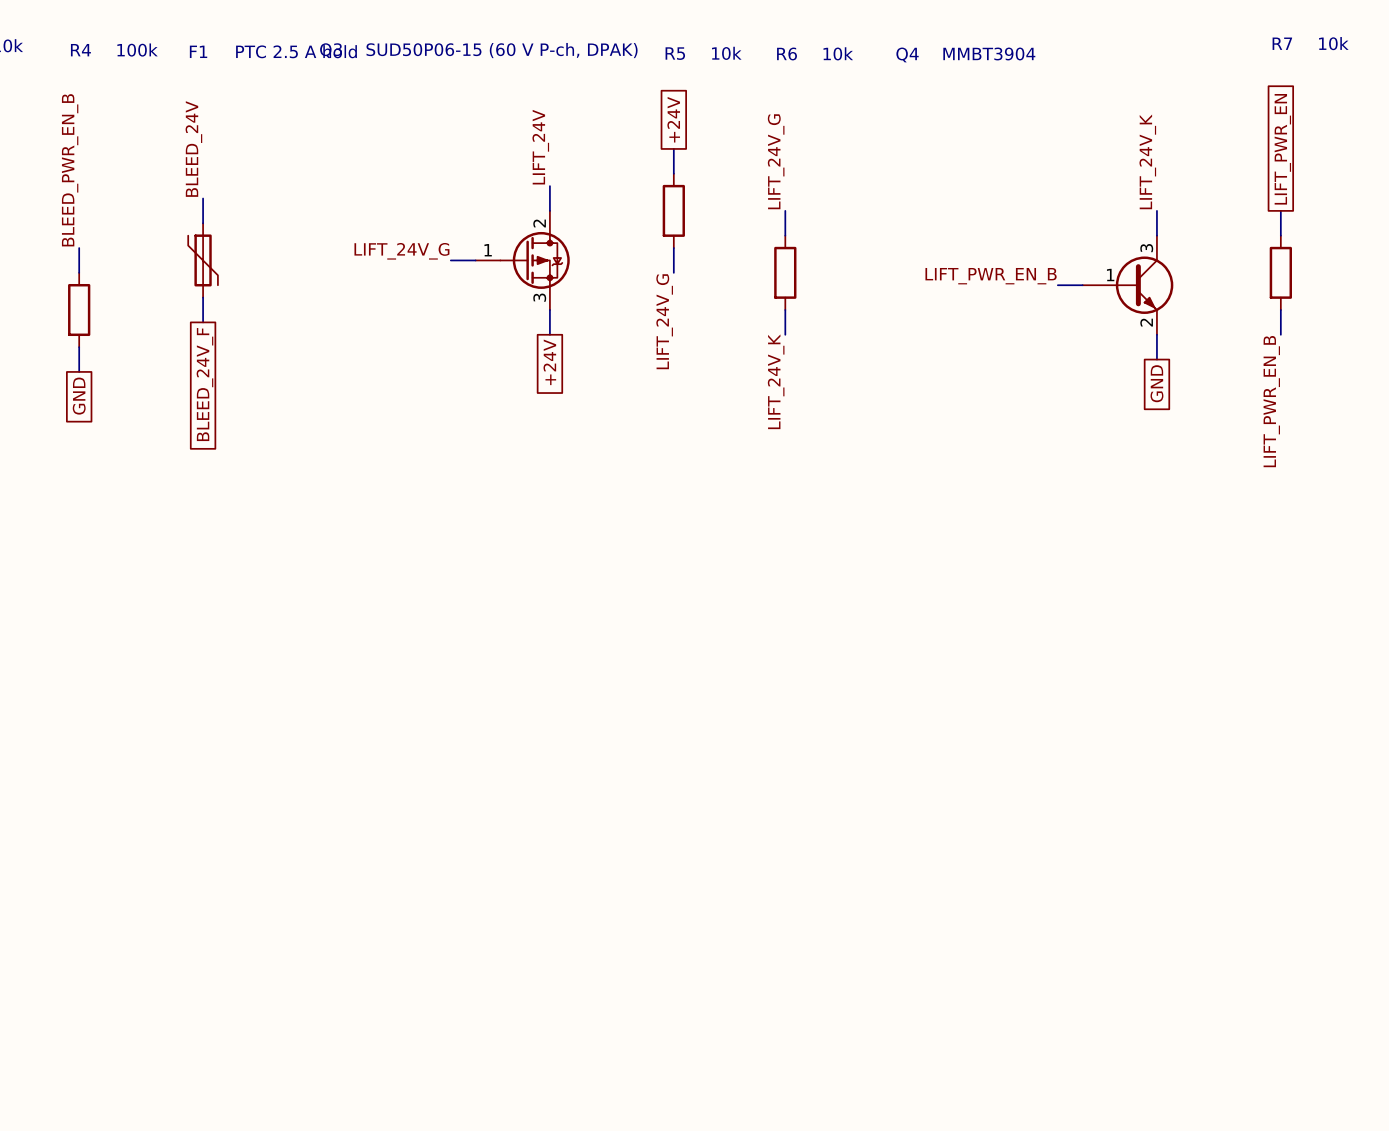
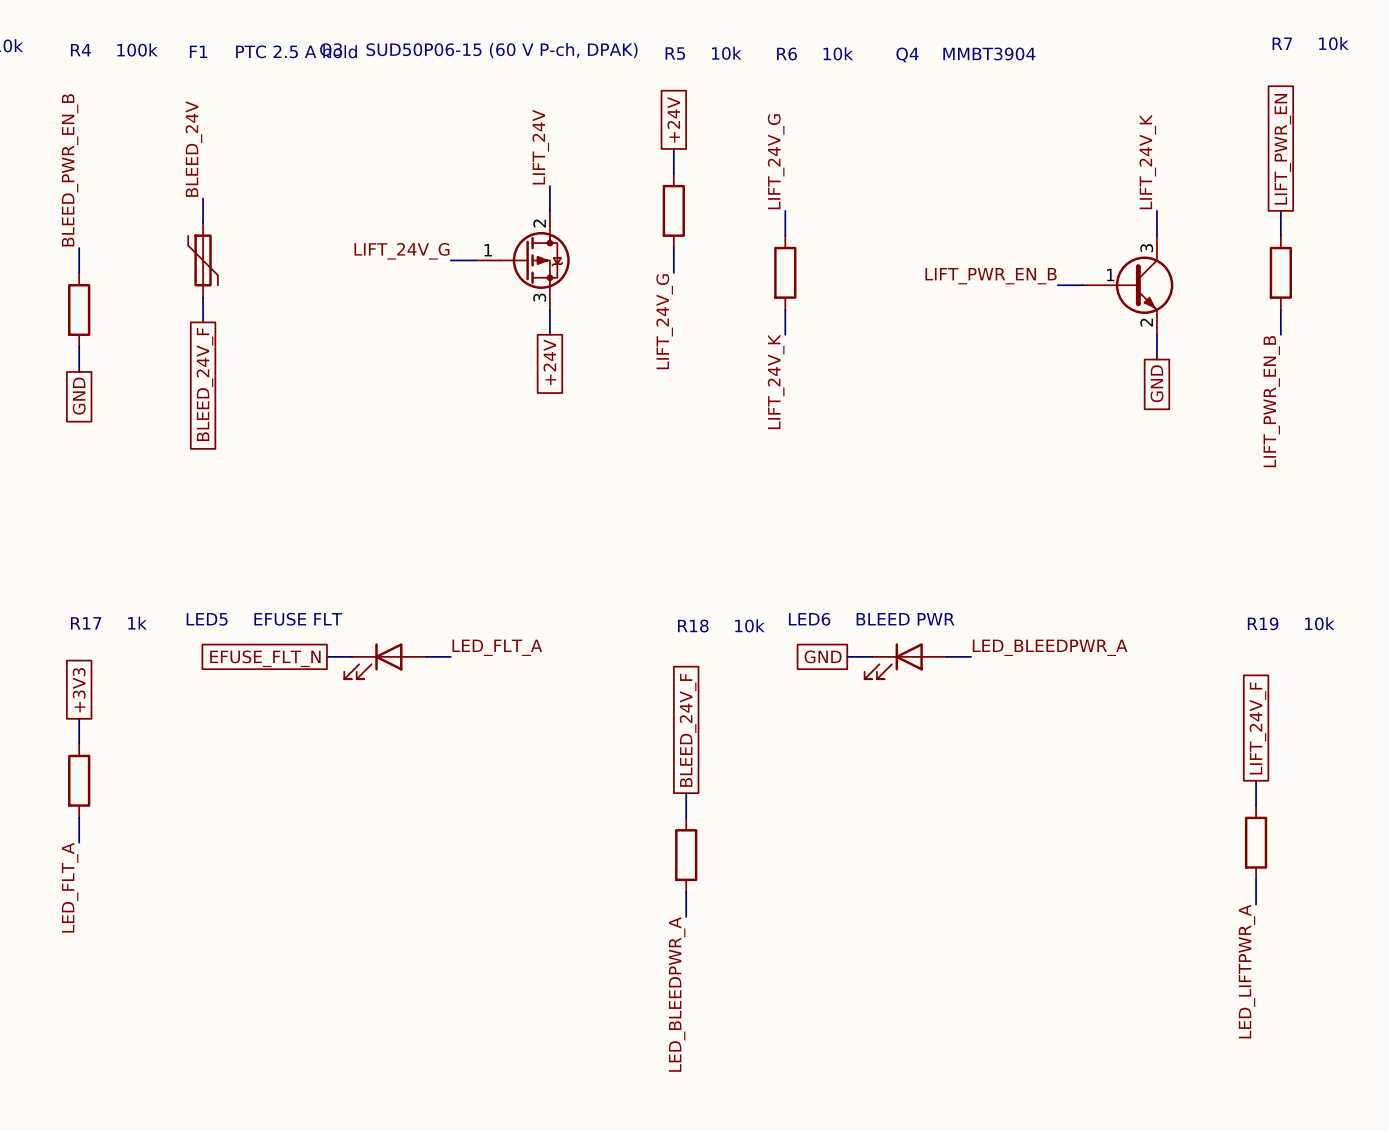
label: none -> LED_FLT_A (497, 647)
label: none -> LED_BLEEDPWR_A (1050, 647)
wire: none -> (326, 656) (351, 656)
wire: none -> (426, 656) (450, 656)
global label: none -> GND (823, 656)
wire: none -> (847, 656) (872, 656)
wire: none -> (946, 656) (971, 656)
global label: none -> EFUSE_FLT_N (265, 658)
LED5: none -> EFUSE FLT (385, 661)
LED6: none -> BLEED PWR (905, 661)
global label: none -> +3V3 (79, 690)
wire: none -> (79, 718) (79, 743)
global label: none -> LIFT_24V_F (1257, 728)
global label: none -> BLEED_24V_F (688, 730)
R17: none -> 1k (79, 780)
wire: none -> (1256, 780) (1256, 805)
wire: none -> (686, 793) (686, 817)
wire: none -> (79, 817) (79, 842)
R19: none -> 10k (1256, 842)
R18: none -> 10k (686, 855)
wire: none -> (1256, 879) (1256, 904)
label: none -> LED_FLT_A (70, 887)
wire: none -> (686, 892) (686, 917)
label: none -> LED_LIFTPWR_A (1247, 971)
label: none -> LED_BLEEDPWR_A (677, 994)

